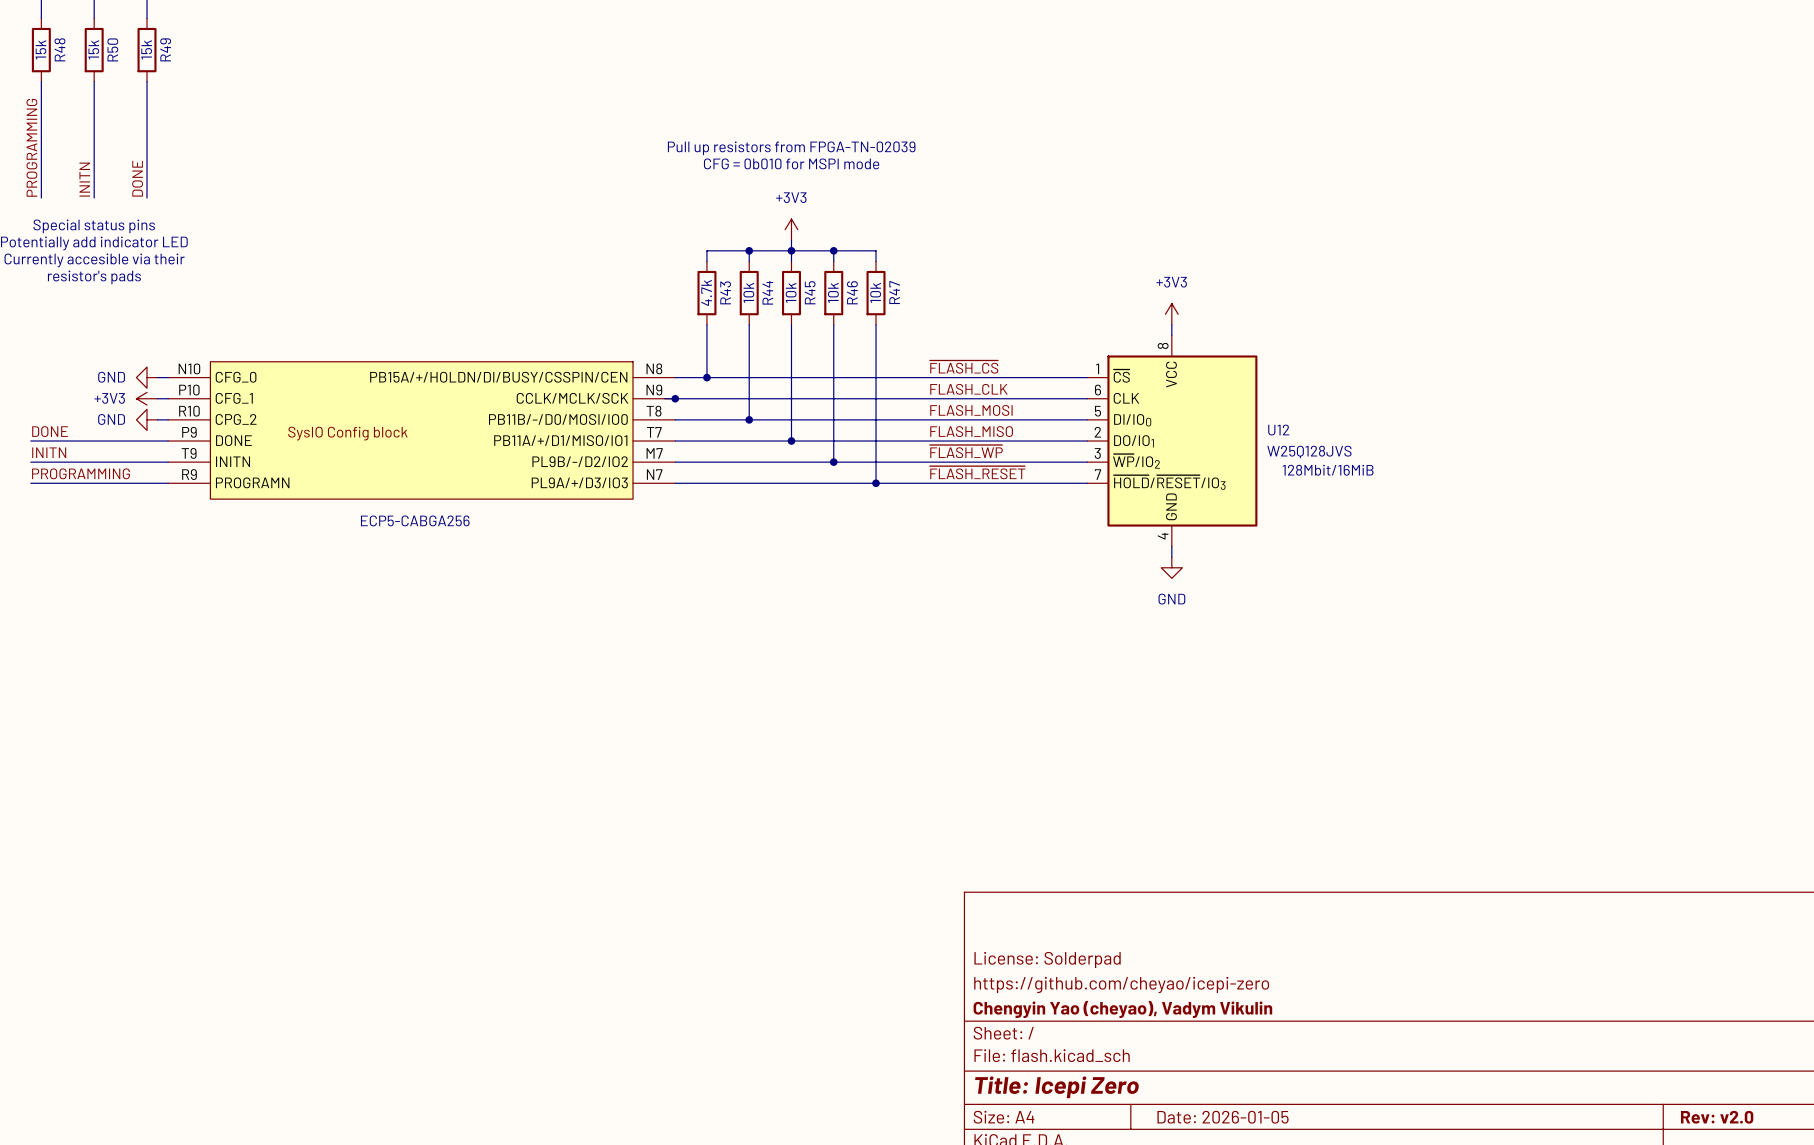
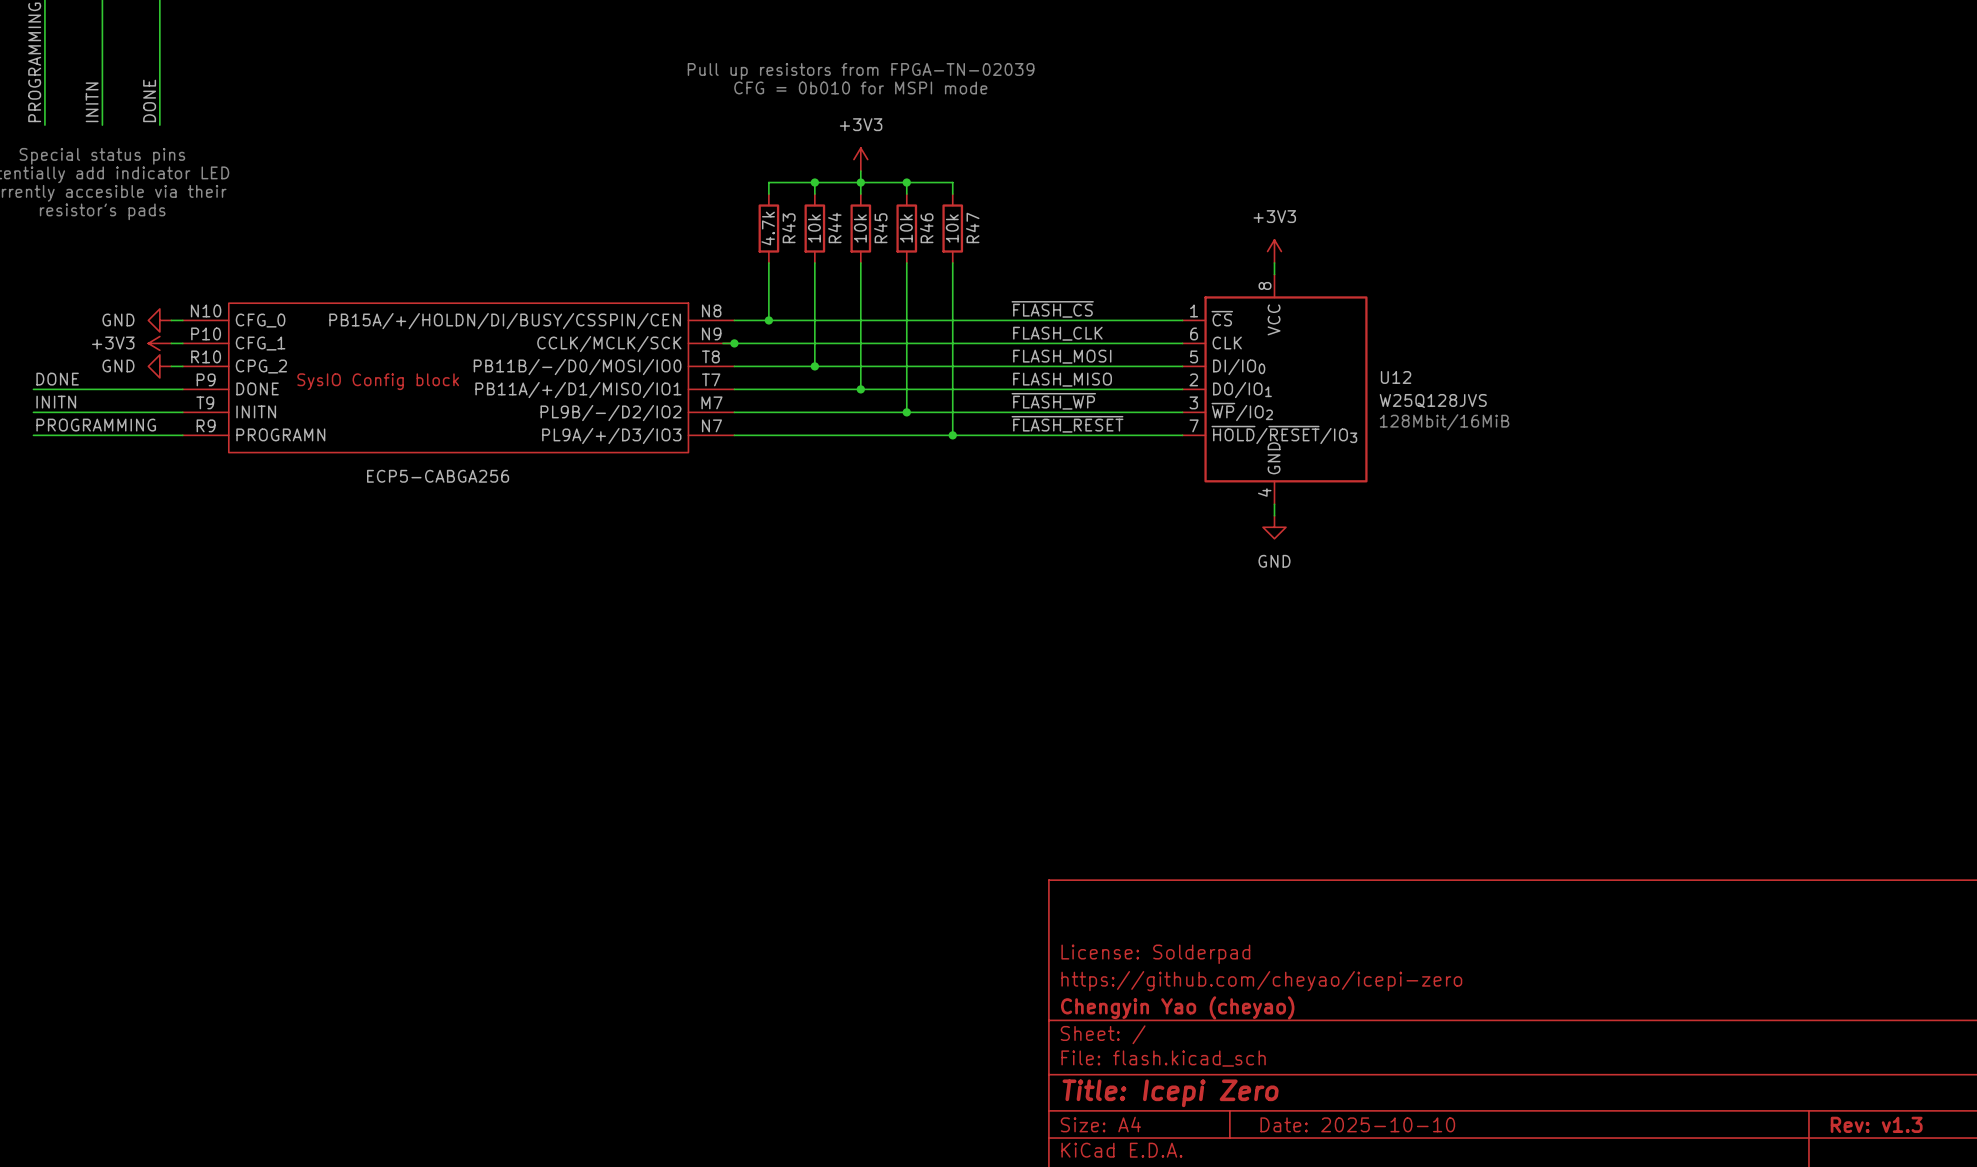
title block: Chengyin Yao (cheyao), Vadym Vikulin (1122, 1009) -> Chengyin Yao (cheyao) (1177, 1007)
title block: Date: 2026-01-05 (1223, 1117) -> Date: 2025-10-10 (1357, 1124)
title block: Rev: v2.0 (1717, 1117) -> Rev: v1.3 (1876, 1124)

